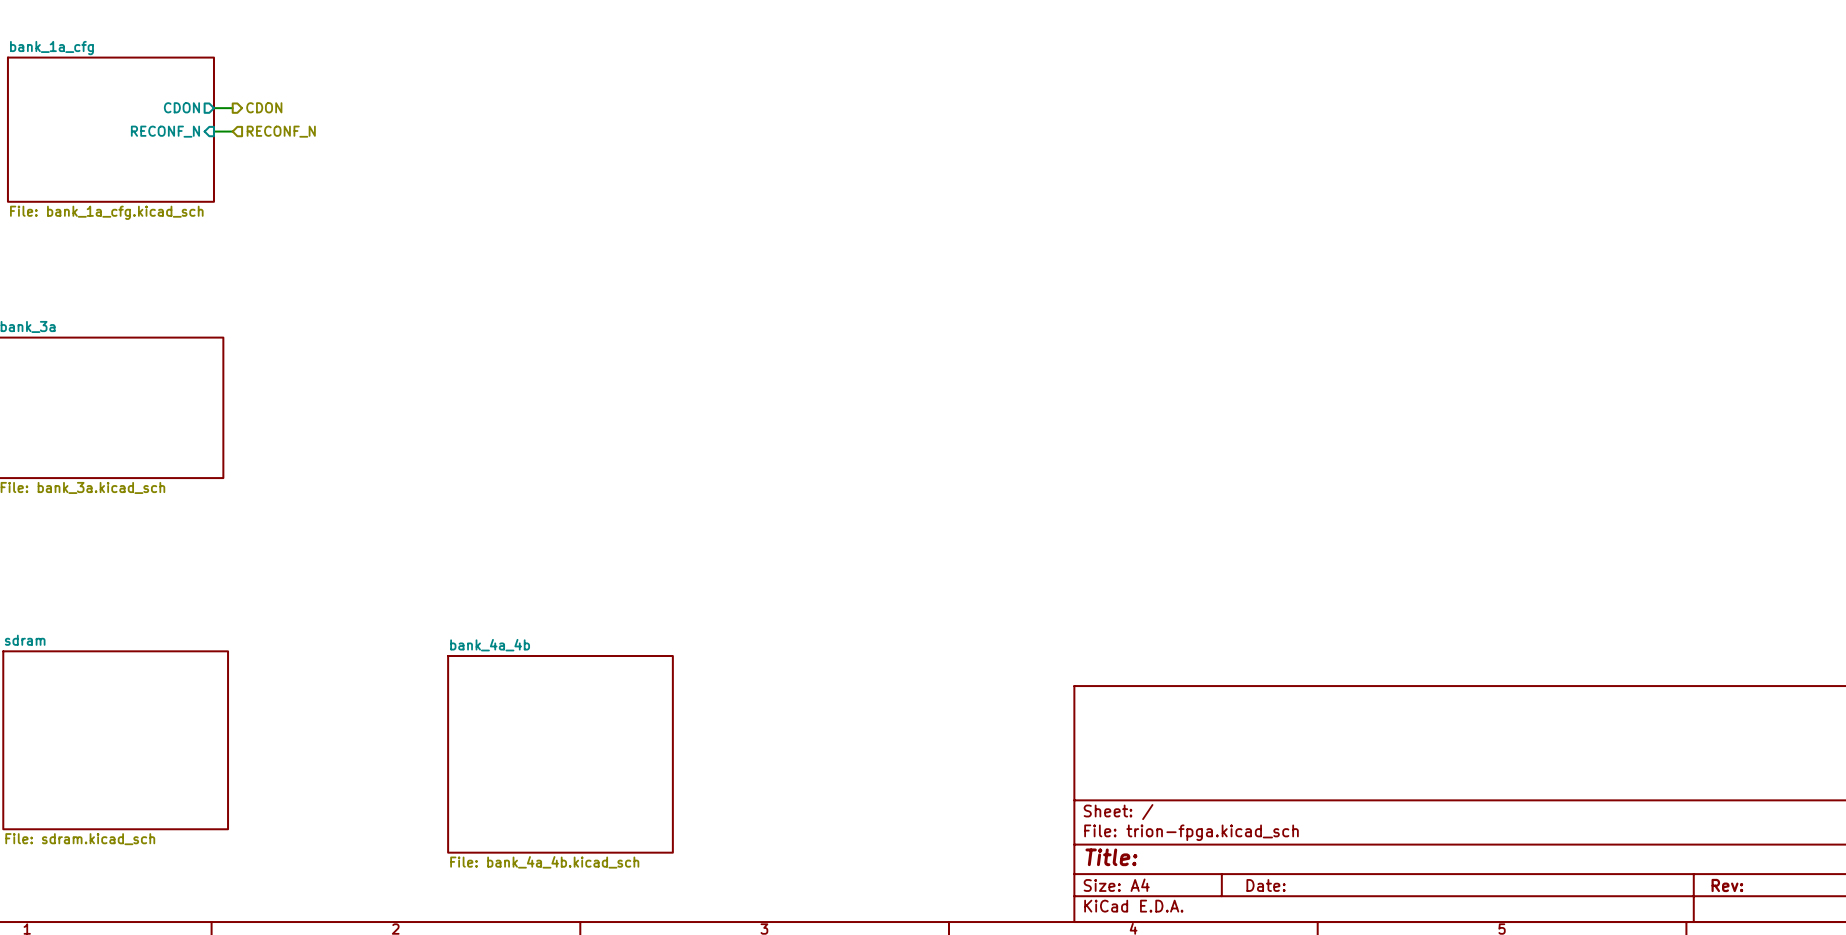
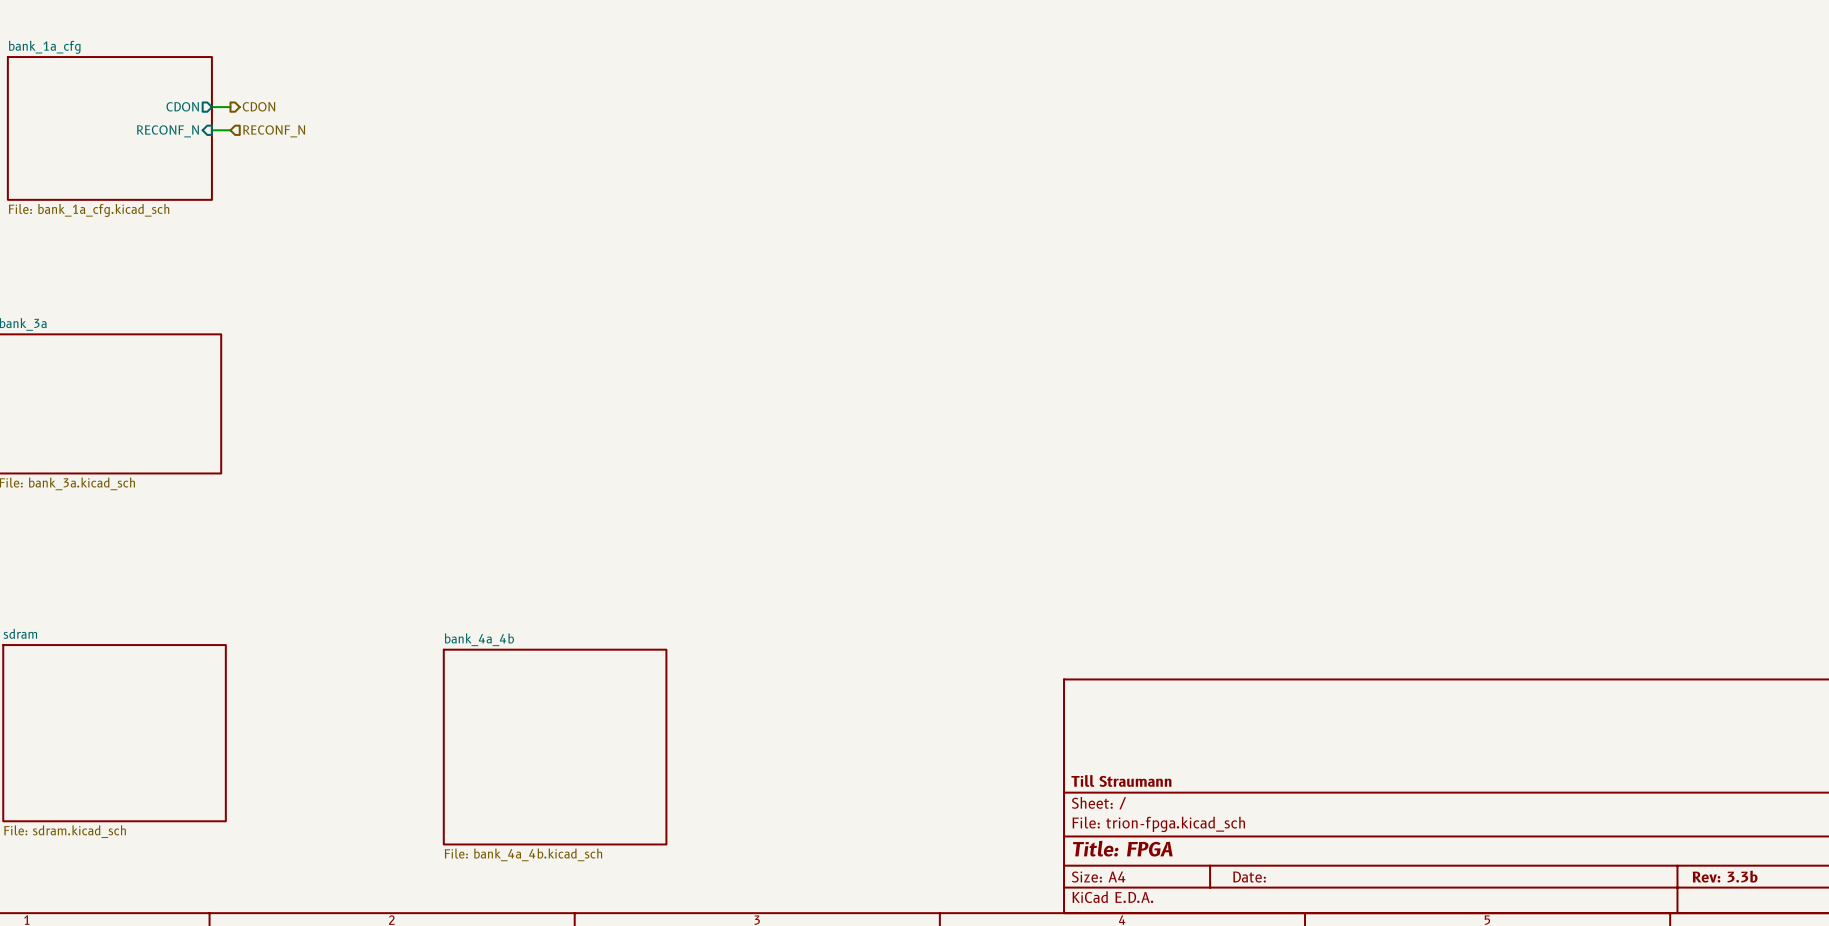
title block: none -> Till Straumann (1121, 780)
title block: Title: (1111, 857) -> Title: FPGA (1122, 848)
title block: Rev: (1727, 885) -> Rev: 3.3b (1725, 876)

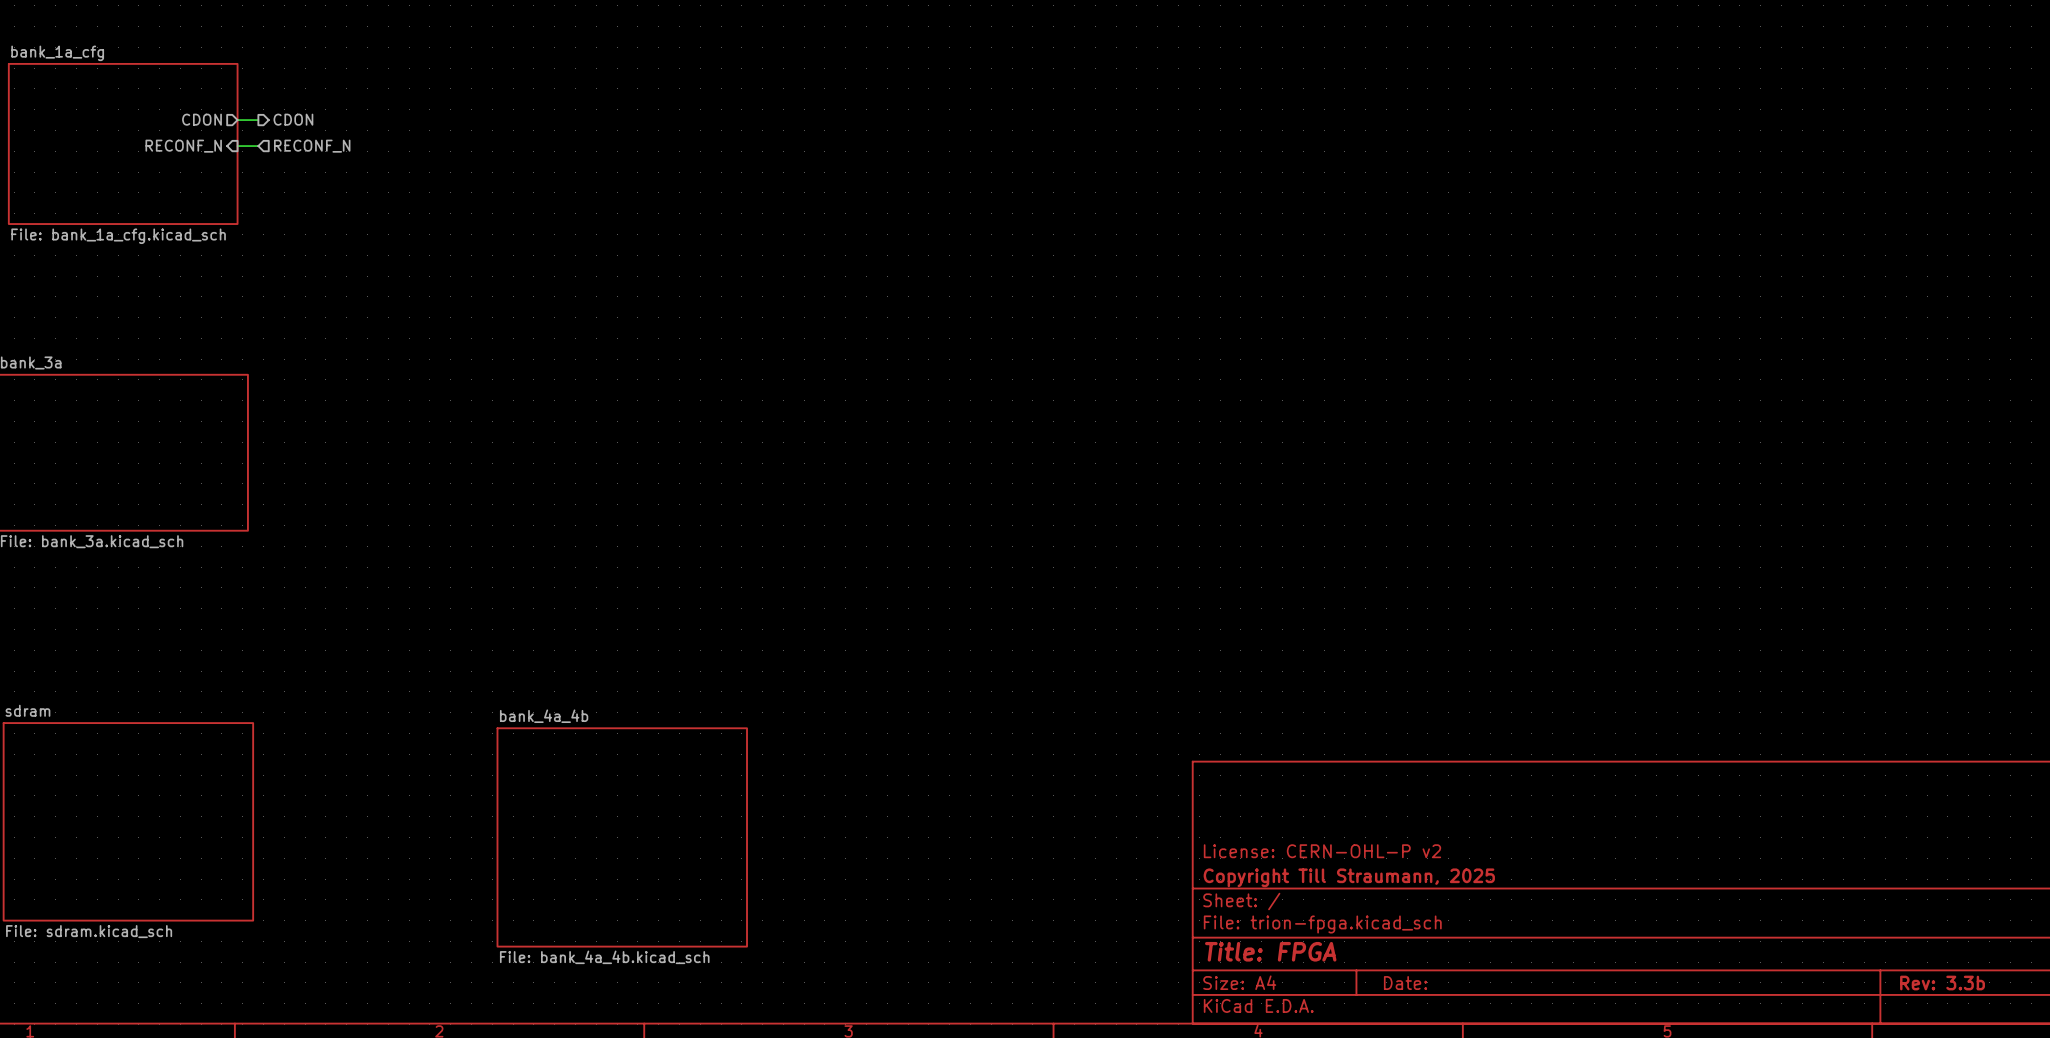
title block: none -> License: CERN-OHL-P v2 (1322, 851)
title block: Till Straumann (1121, 780) -> Copyright Till Straumann, 2025 (1349, 877)

